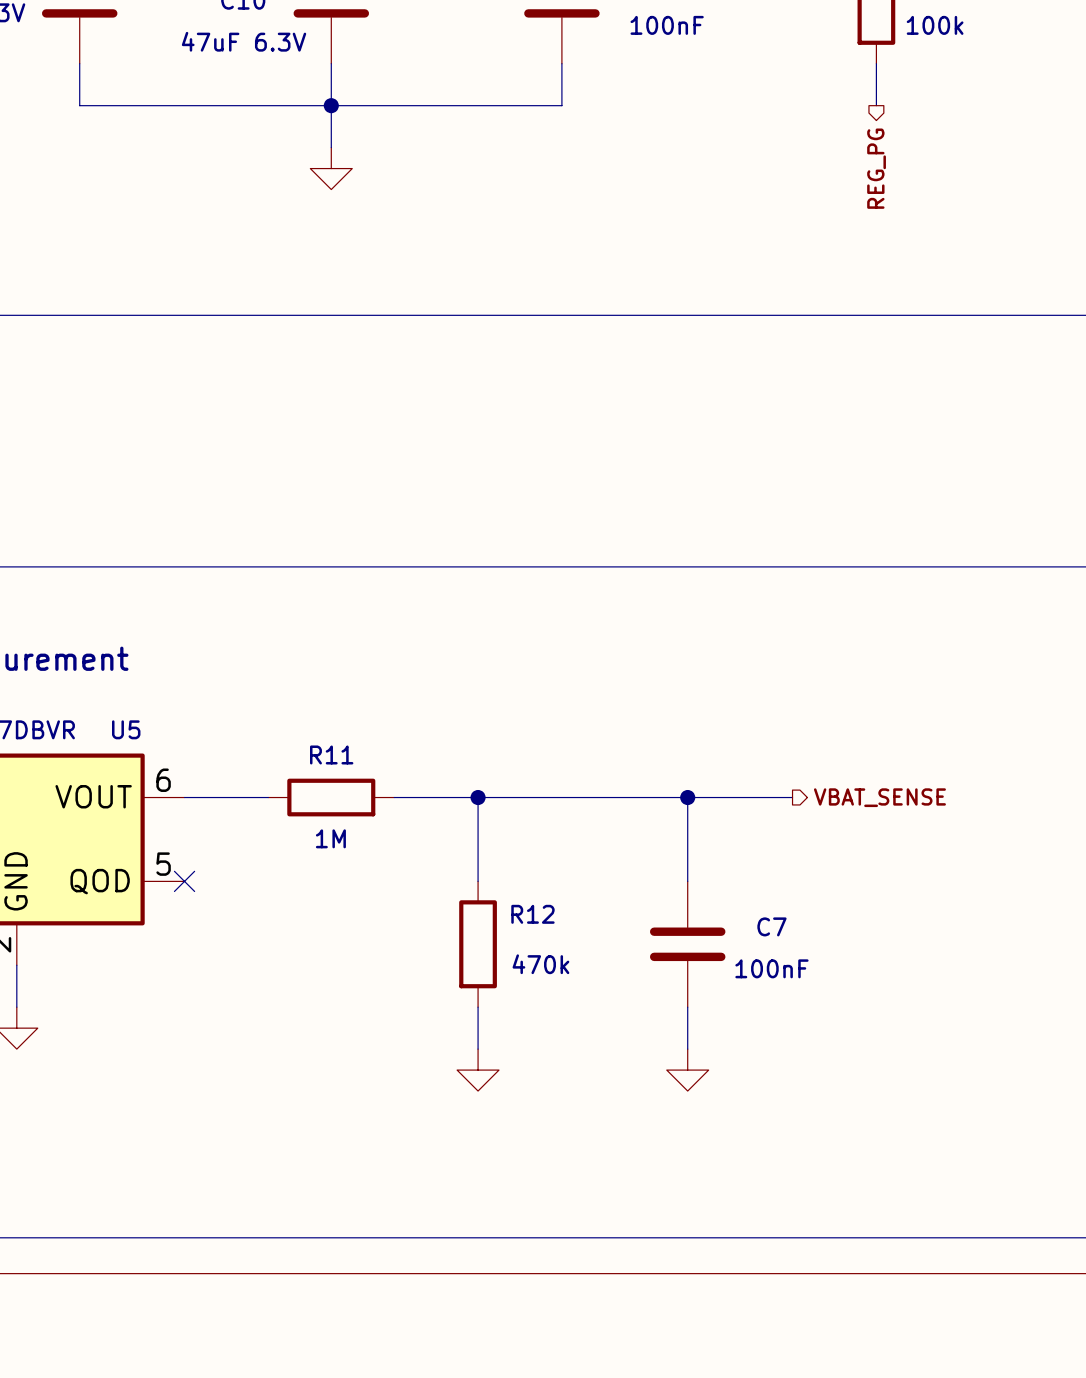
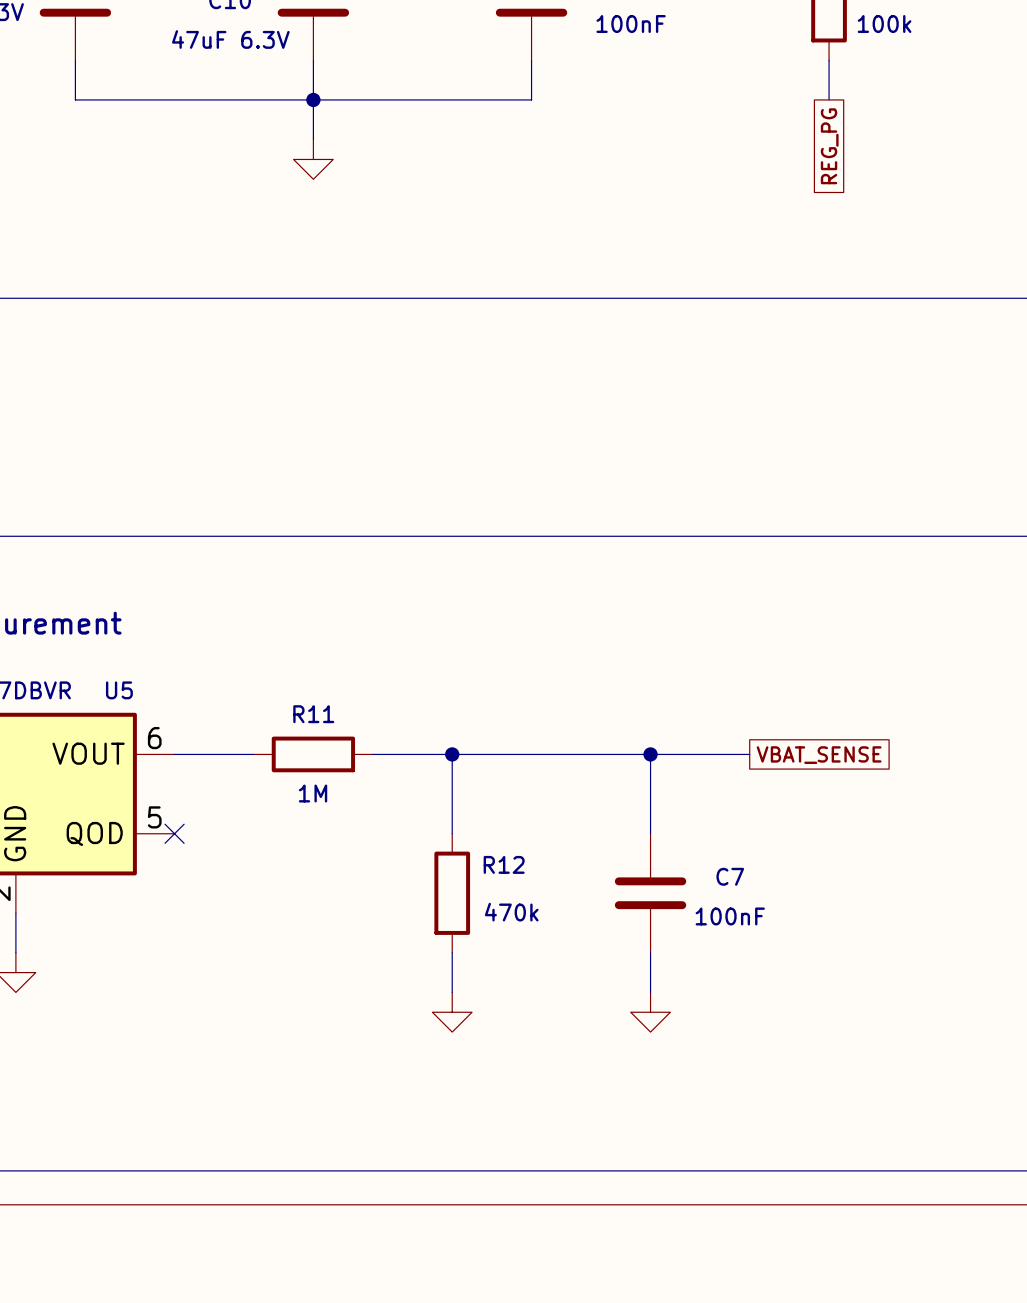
global label: none -> REG_PG (829, 146)
hierarchical label: REG_PG (876, 168) -> none
hierarchical label: VBAT_SENSE (879, 797) -> none
global label: none -> VBAT_SENSE (819, 755)

